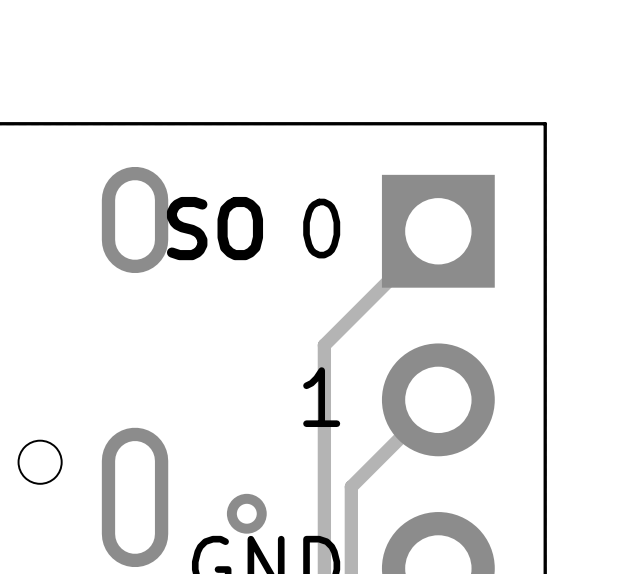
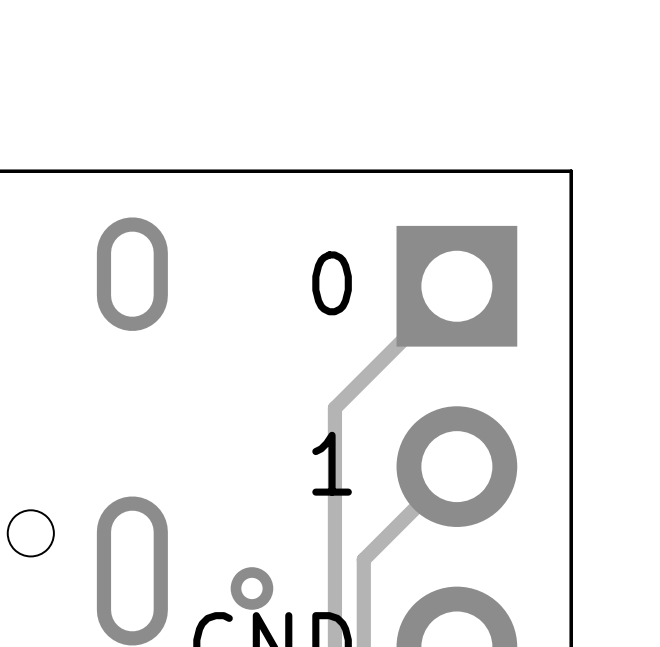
text: SO (214, 228) -> none

